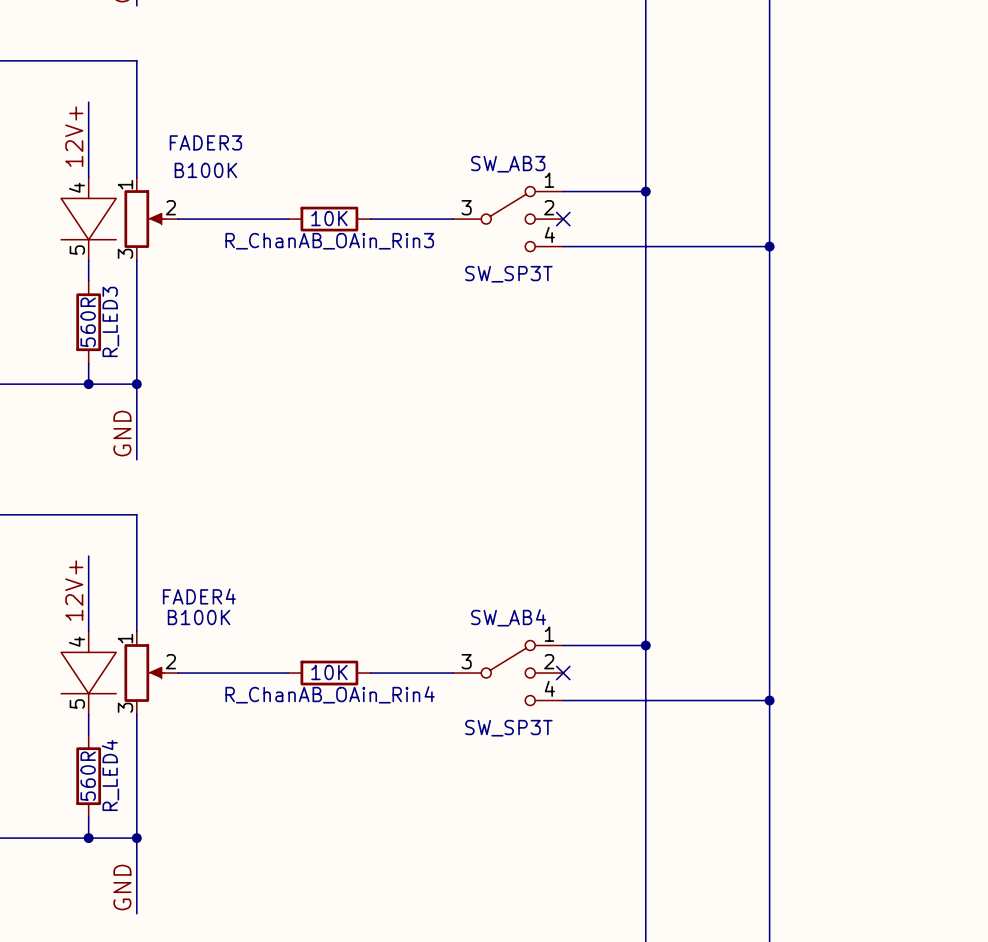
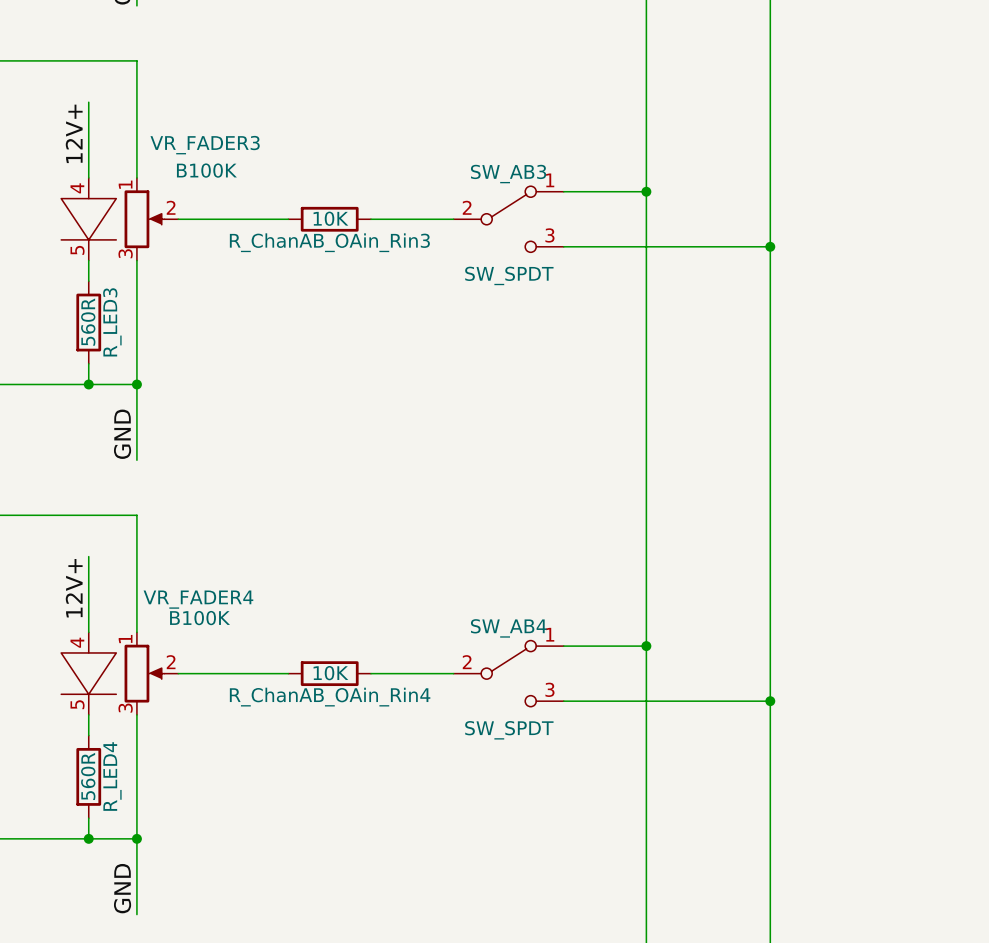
FADER3 name: FADER3 (205, 142) -> VR_FADER3 (205, 145)
SW_AB3 symbol: [453, 186, 564, 252] -> [453, 186, 564, 253]
no-connect mark: (563, 219) -> none
SW_AB3 value: SW_SP3T (508, 274) -> SW_SPDT (509, 275)
FADER4 name: FADER4 (199, 596) -> VR_FADER4 (198, 599)
SW_AB4 symbol: [453, 640, 564, 706] -> [453, 640, 564, 707]
no-connect mark: (563, 673) -> none
SW_AB4 value: SW_SP3T (508, 728) -> SW_SPDT (509, 730)

